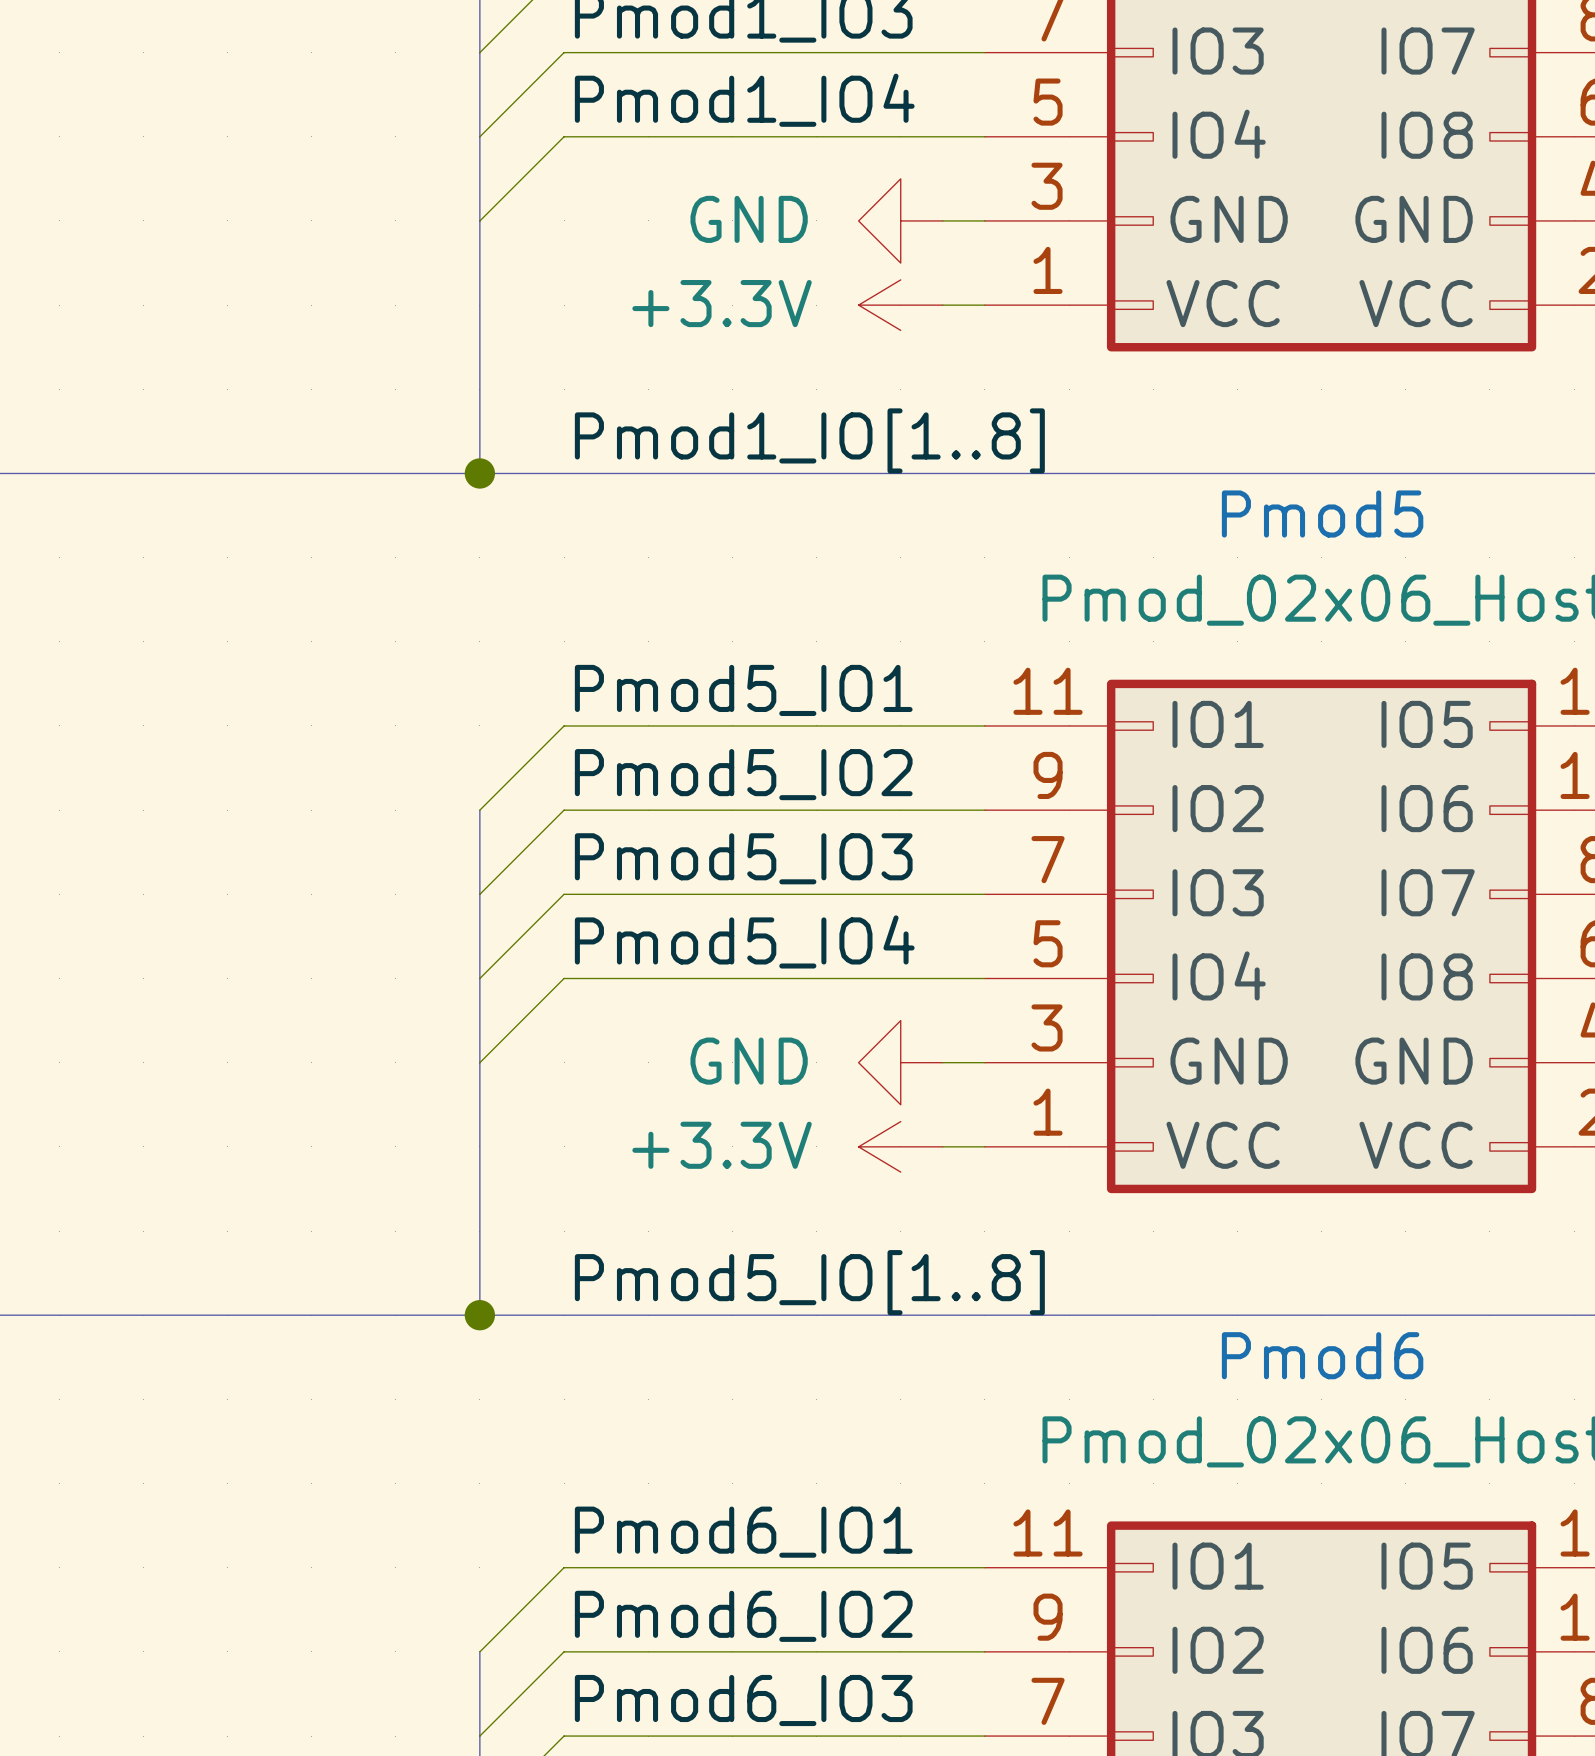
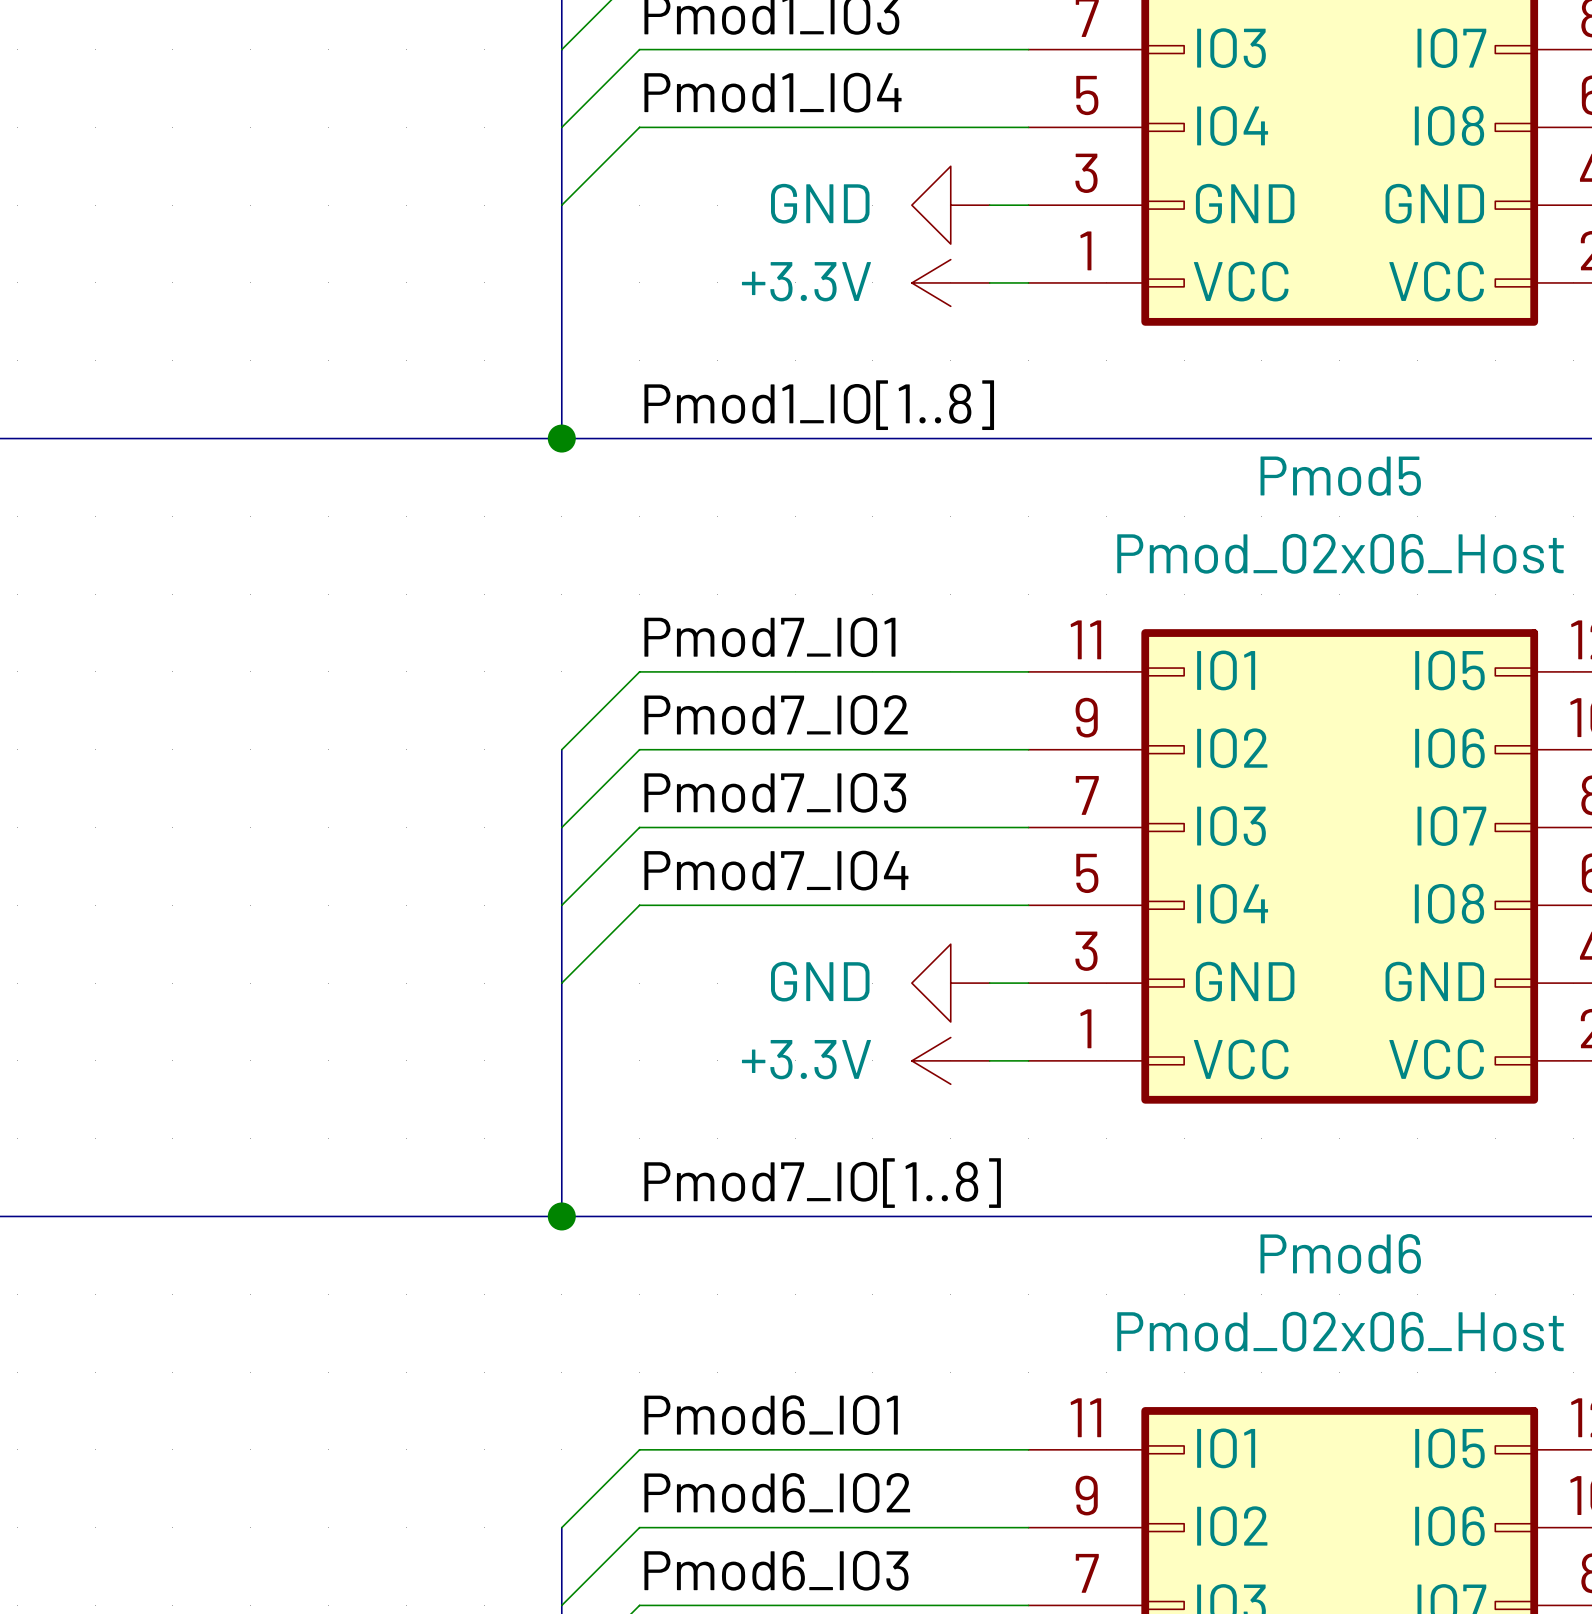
label: Pmod5_IO1 (743, 690) -> Pmod7_IO1 (769, 637)
label: Pmod5_IO2 (743, 774) -> Pmod7_IO2 (776, 715)
label: Pmod5_IO3 (743, 858) -> Pmod7_IO3 (775, 792)
label: Pmod5_IO4 (744, 941) -> Pmod7_IO4 (776, 870)
label: Pmod5_IO[1..8] (809, 1282) -> Pmod7_IO[1..8] (822, 1183)

